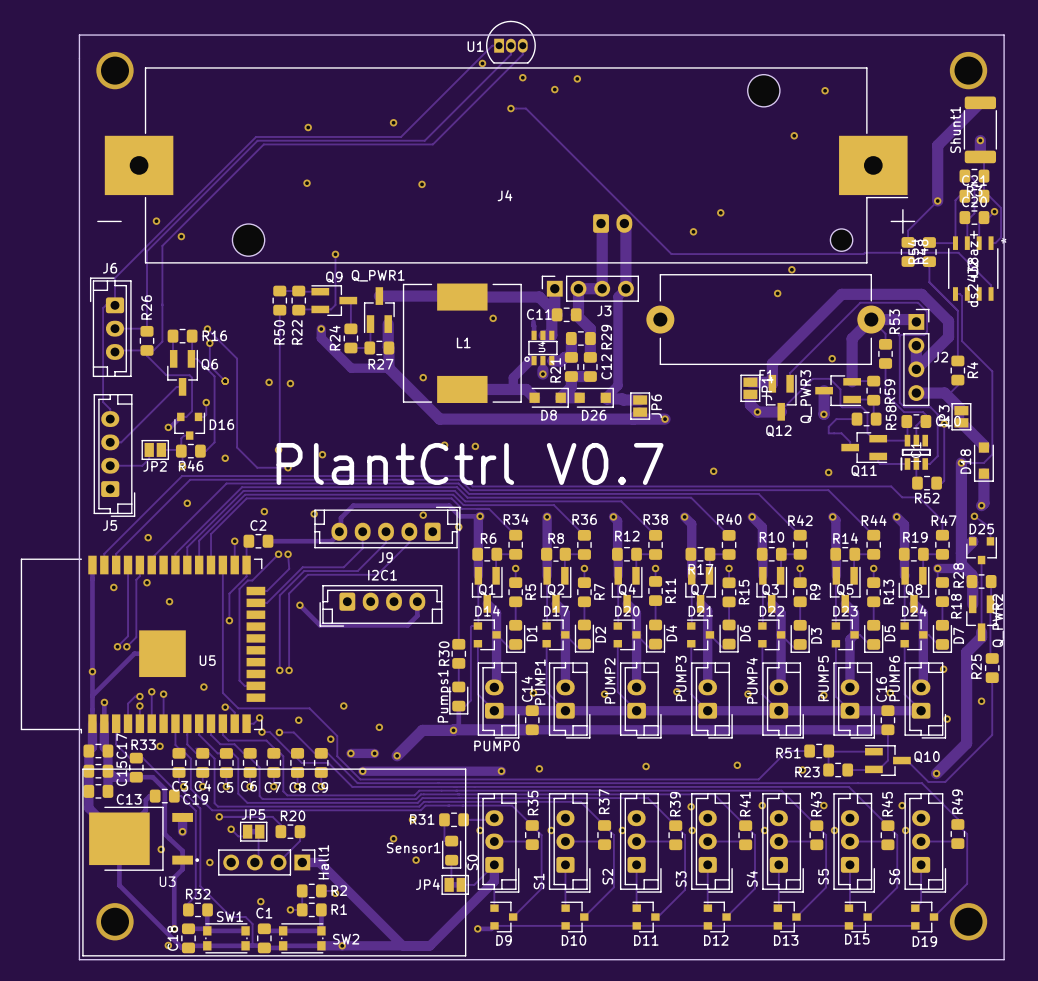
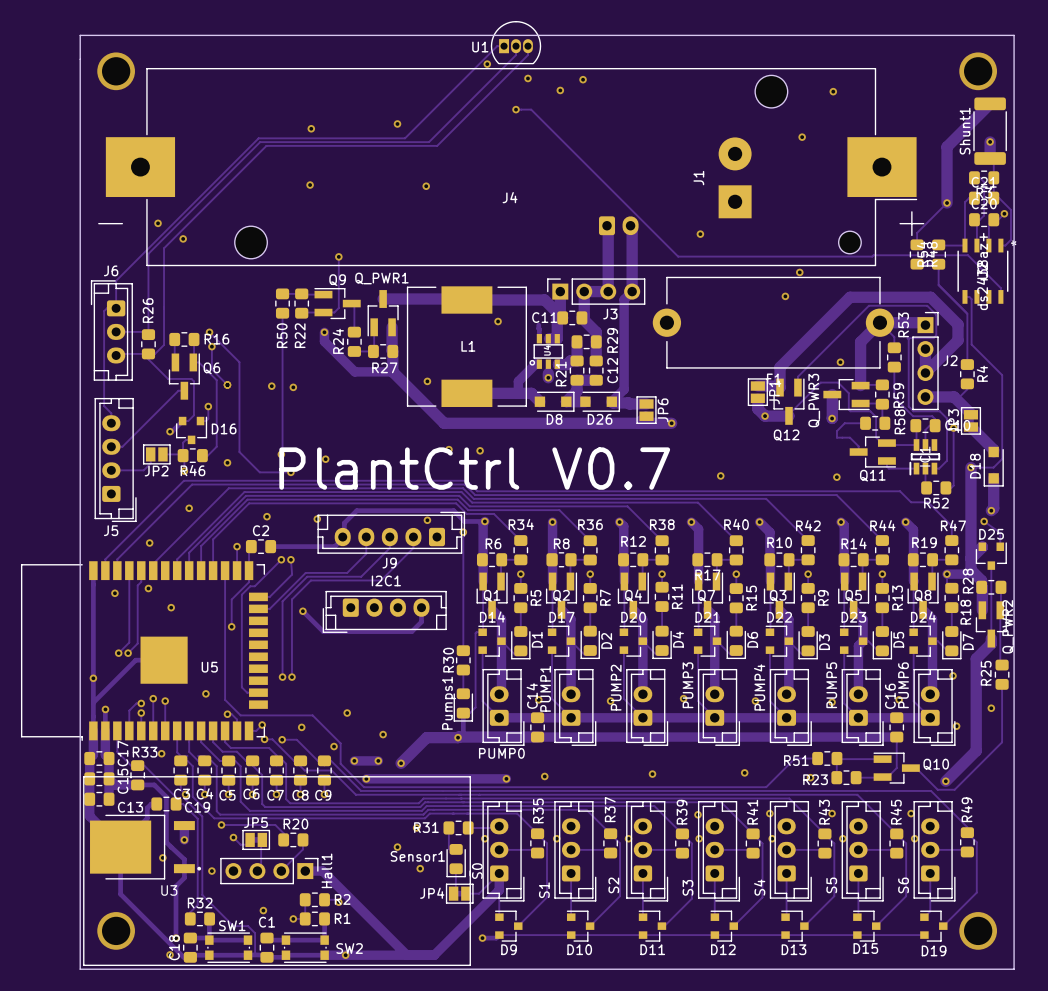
J1: none -> (735, 177)
via: (720, 212) -> none

